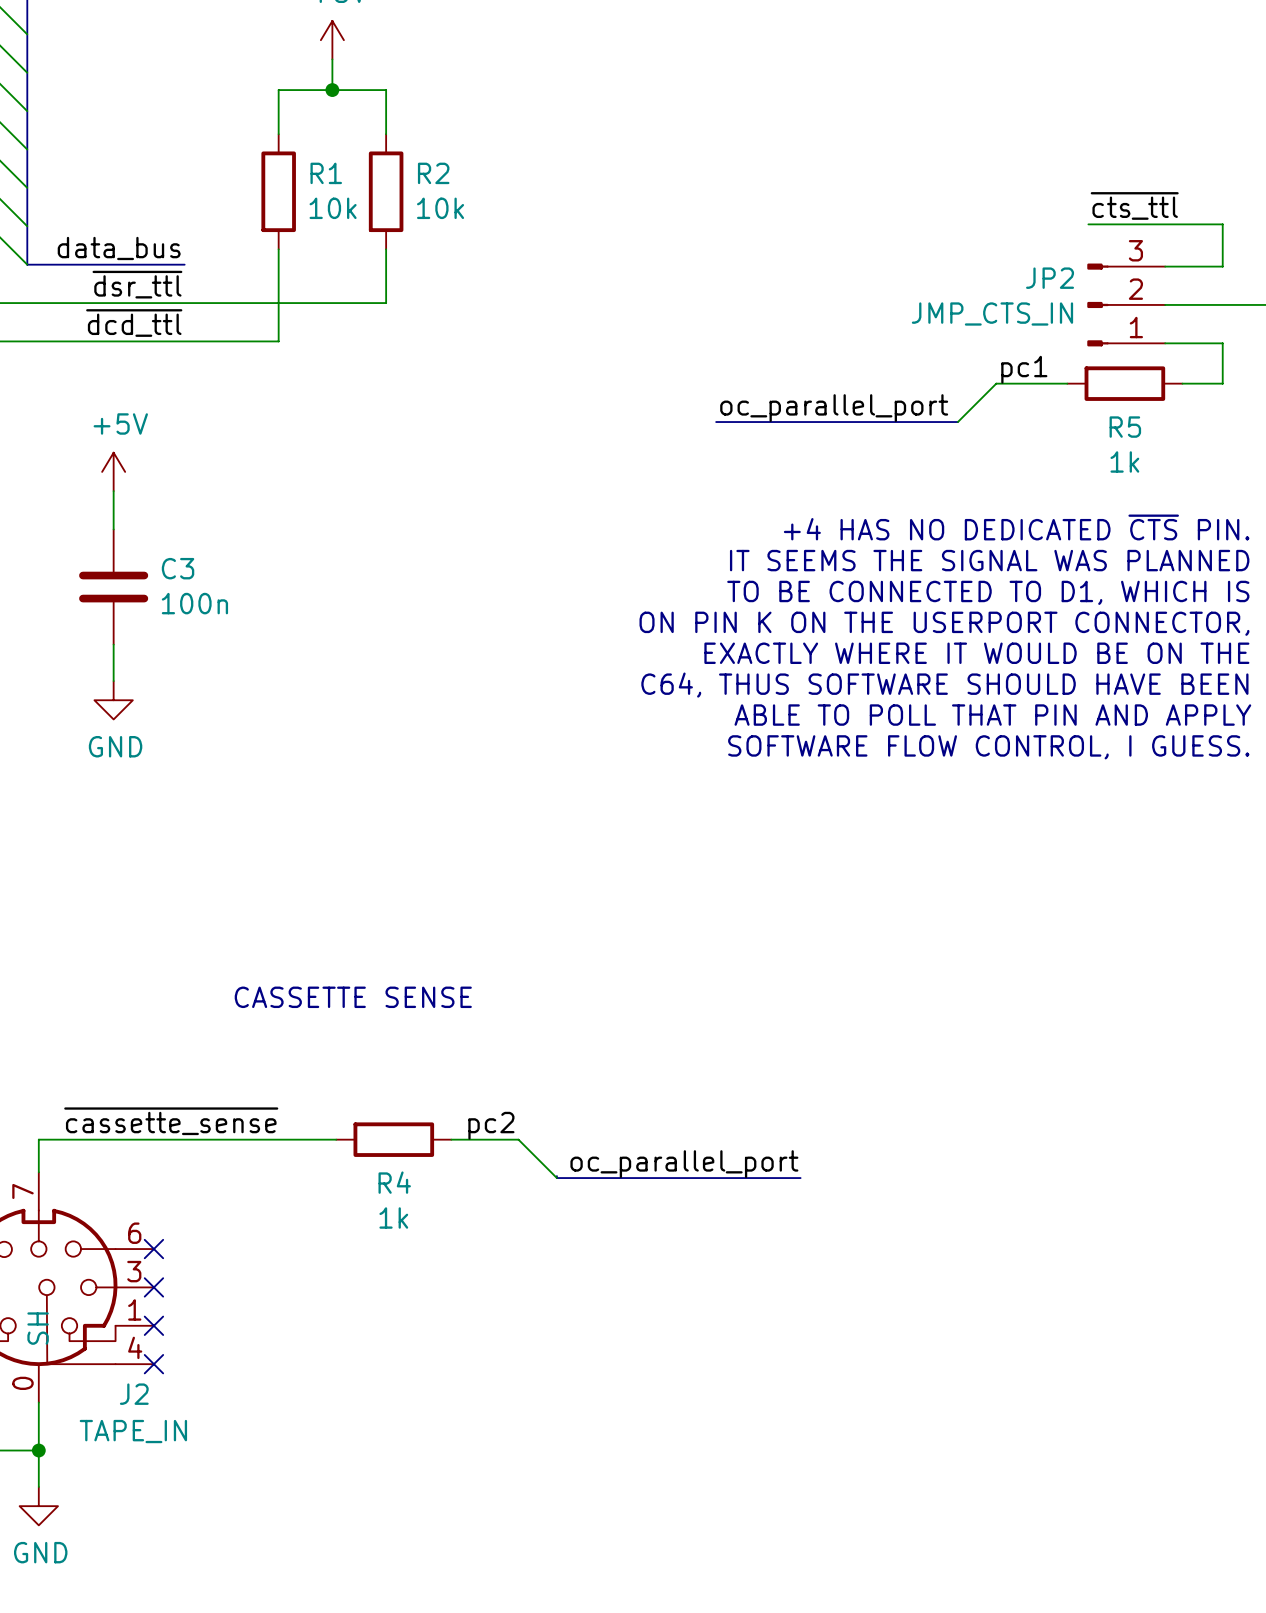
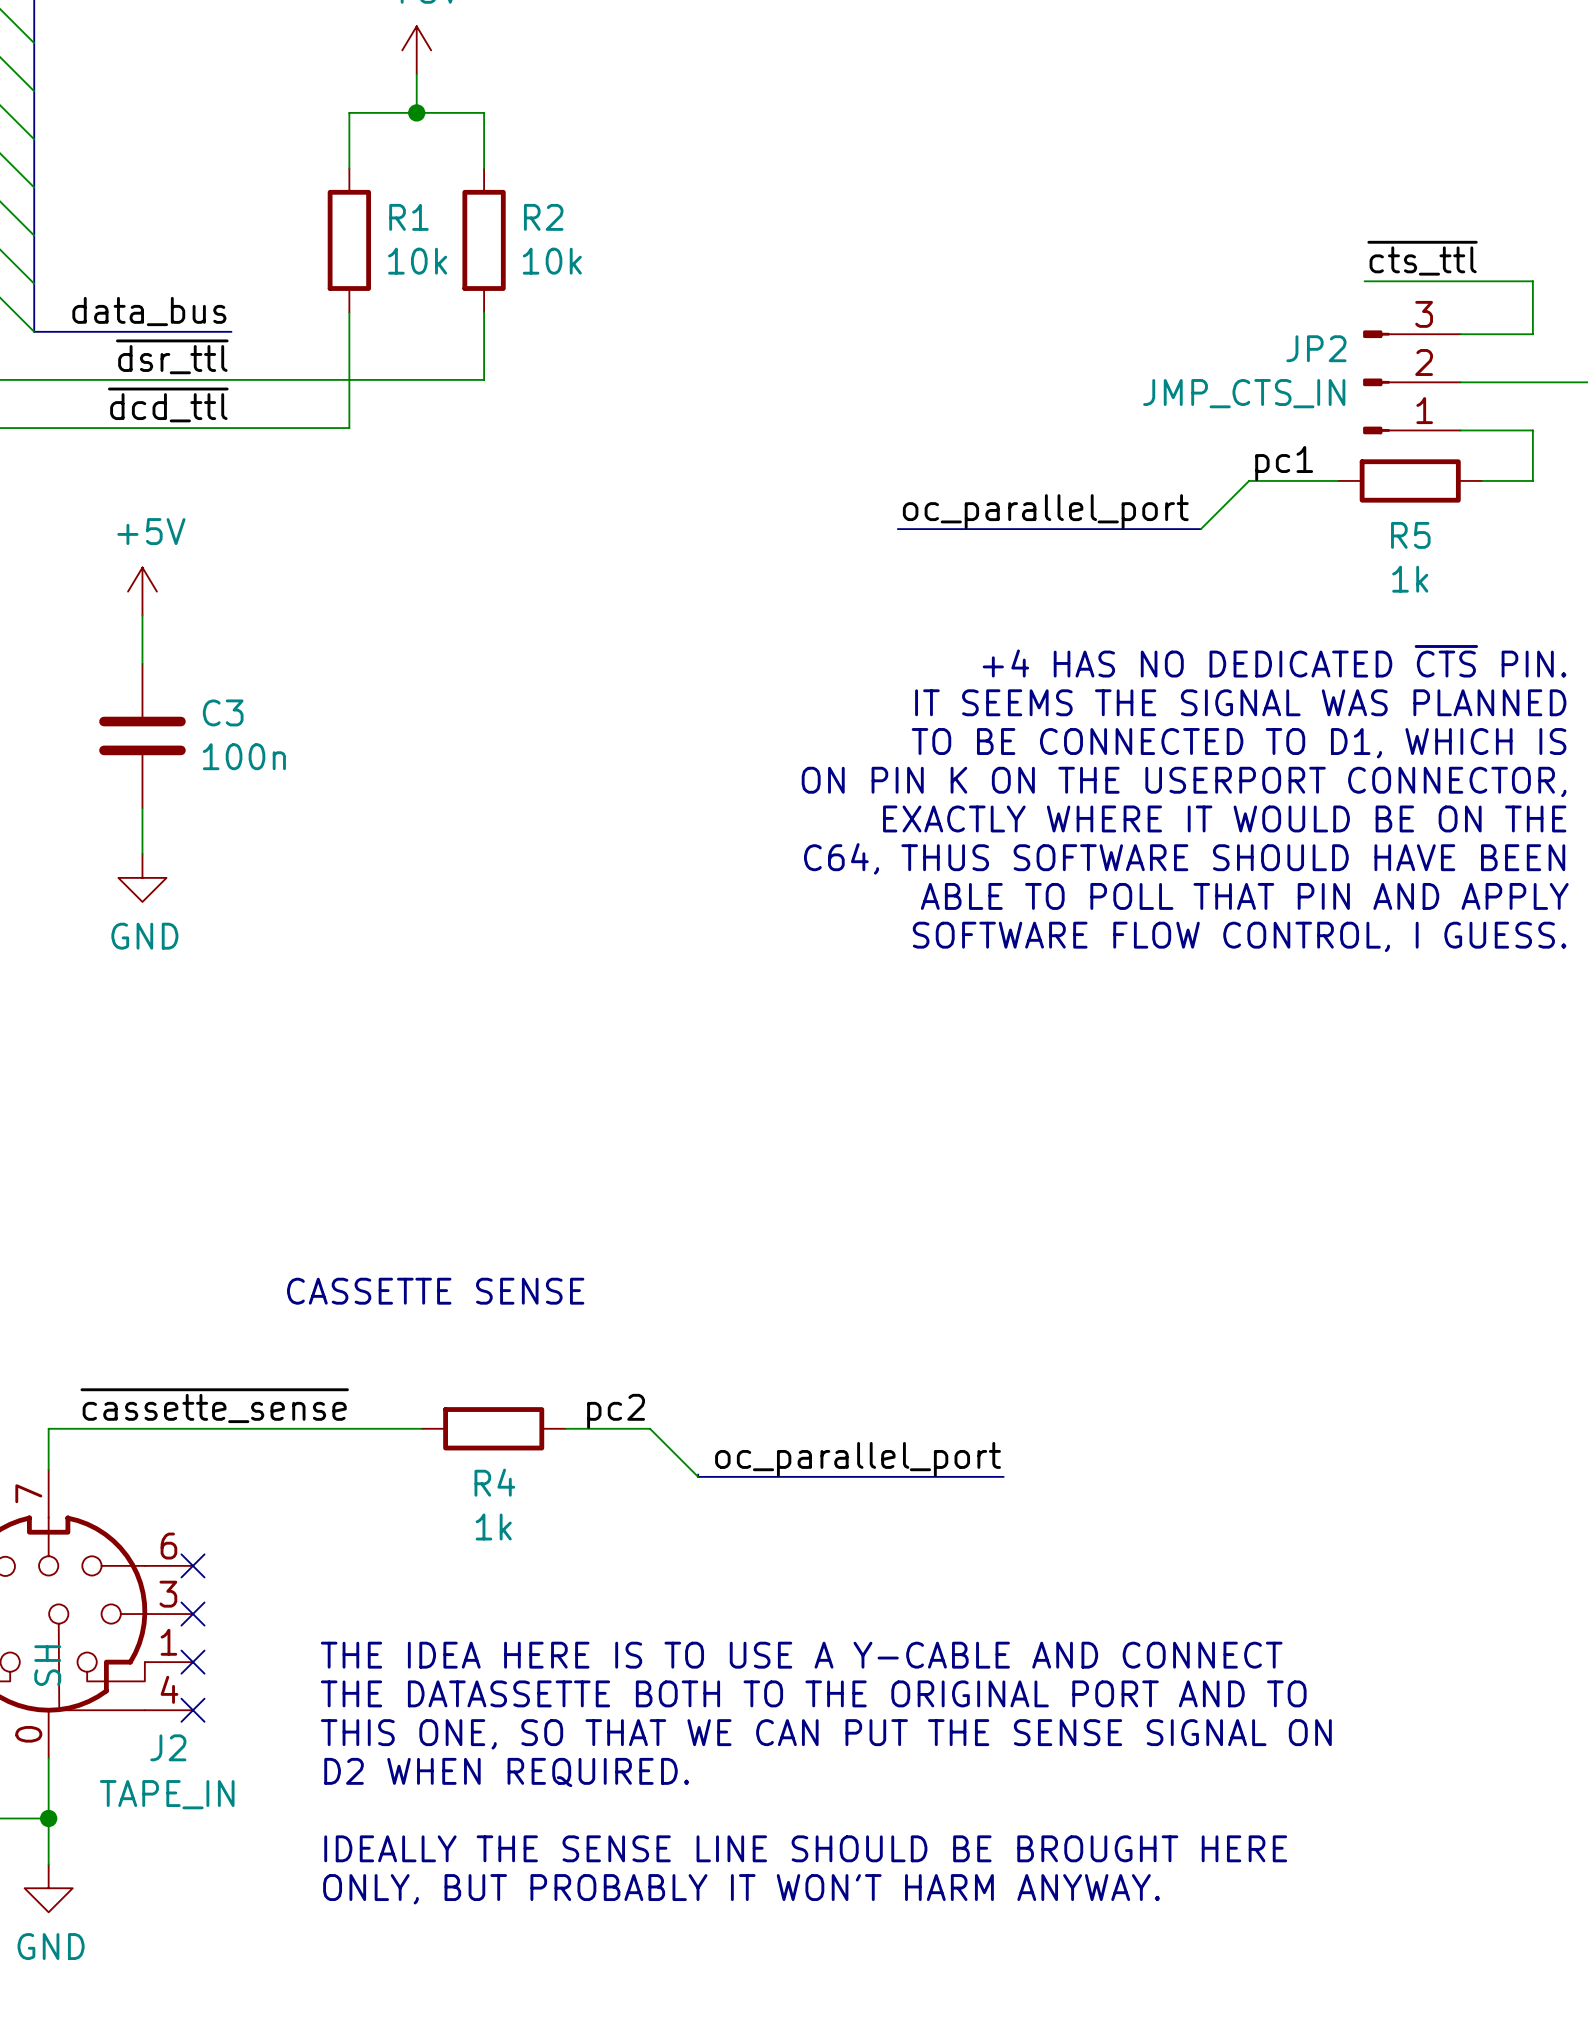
text position: CASSETTE SENSE (353, 997) -> CASSETTE SENSE (435, 1291)
text: none -> THE IDEA HERE IS TO USE A Y-CABLE AND CONNECT (801, 1655)
text: none -> THE DATASSETTE BOTH TO THE ORIGINAL PORT AND TO (813, 1693)
text: none -> THIS ONE, SO THAT WE CAN PUT THE SENSE SIGNAL ON (826, 1734)
text: none -> D2 WHEN REQUIRED. (506, 1772)
text: none -> IDEALLY THE SENSE LINE SHOULD BE BROUGHT HERE (805, 1848)
text: none -> ONLY, BUT PROBABLY IT WON'T HARM ANYWAY. (741, 1889)

